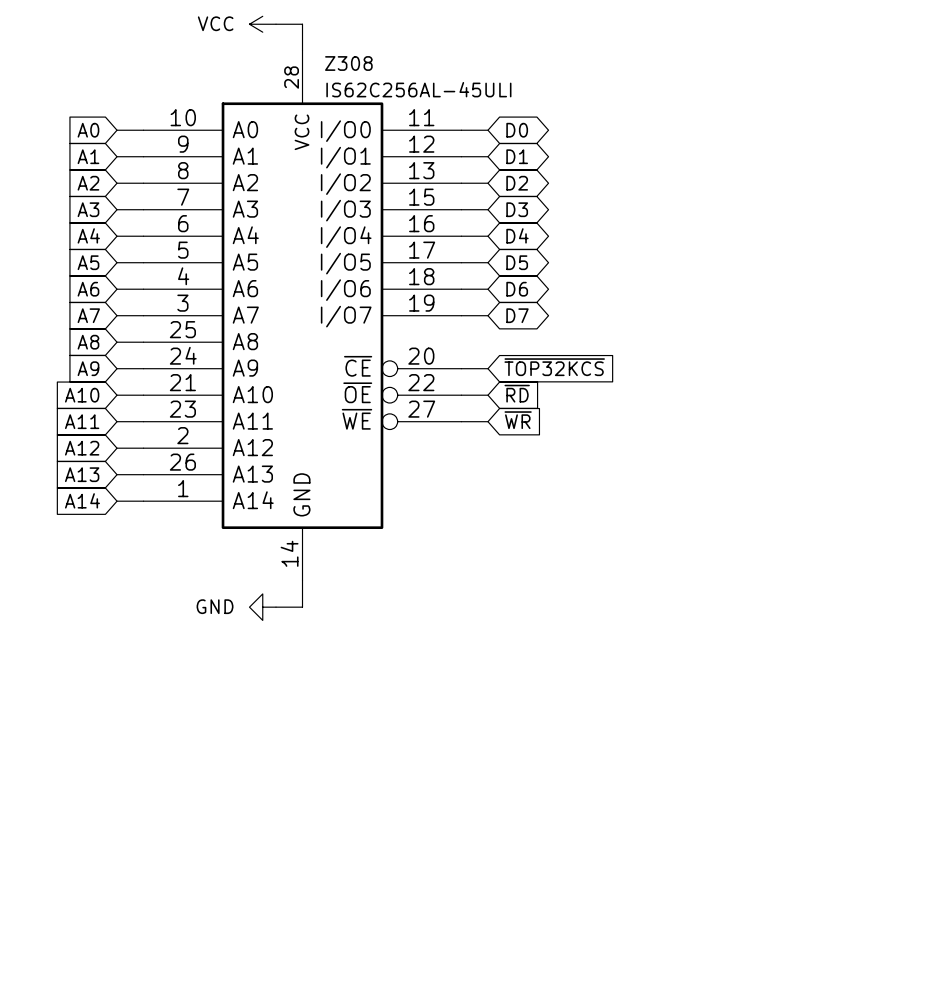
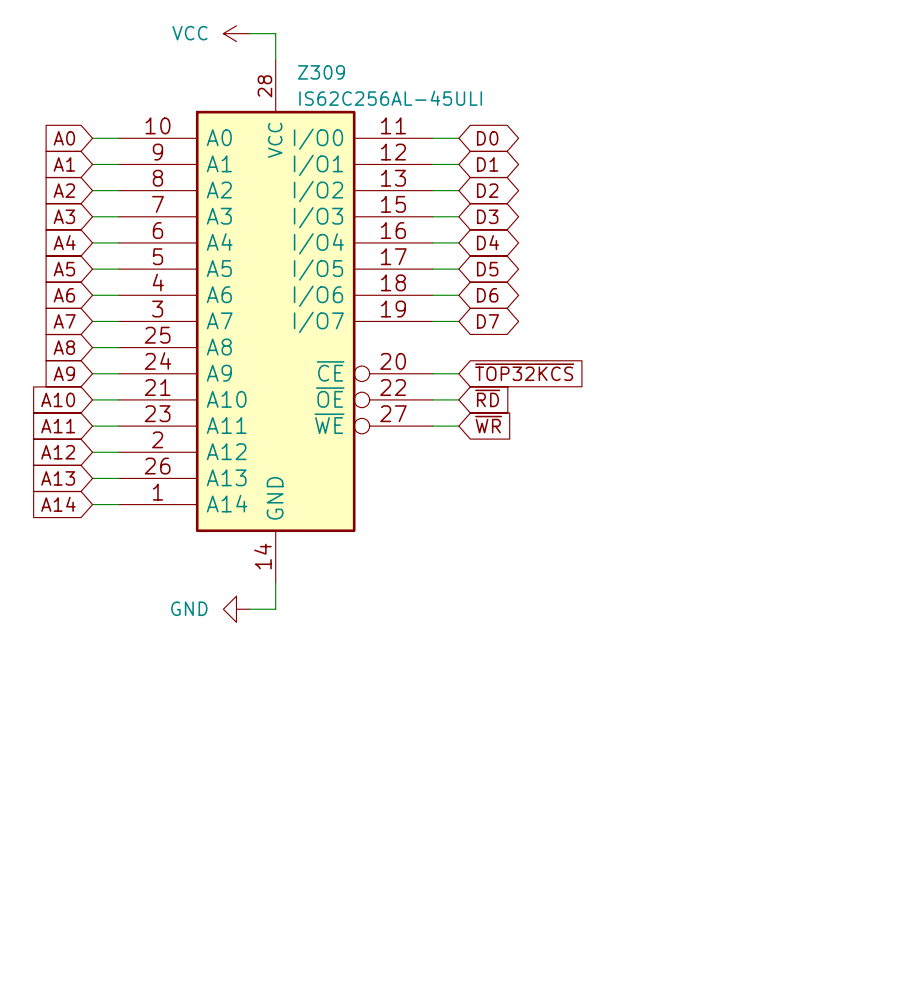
Z308 name: Z308 (348, 63) -> Z309 (321, 72)

